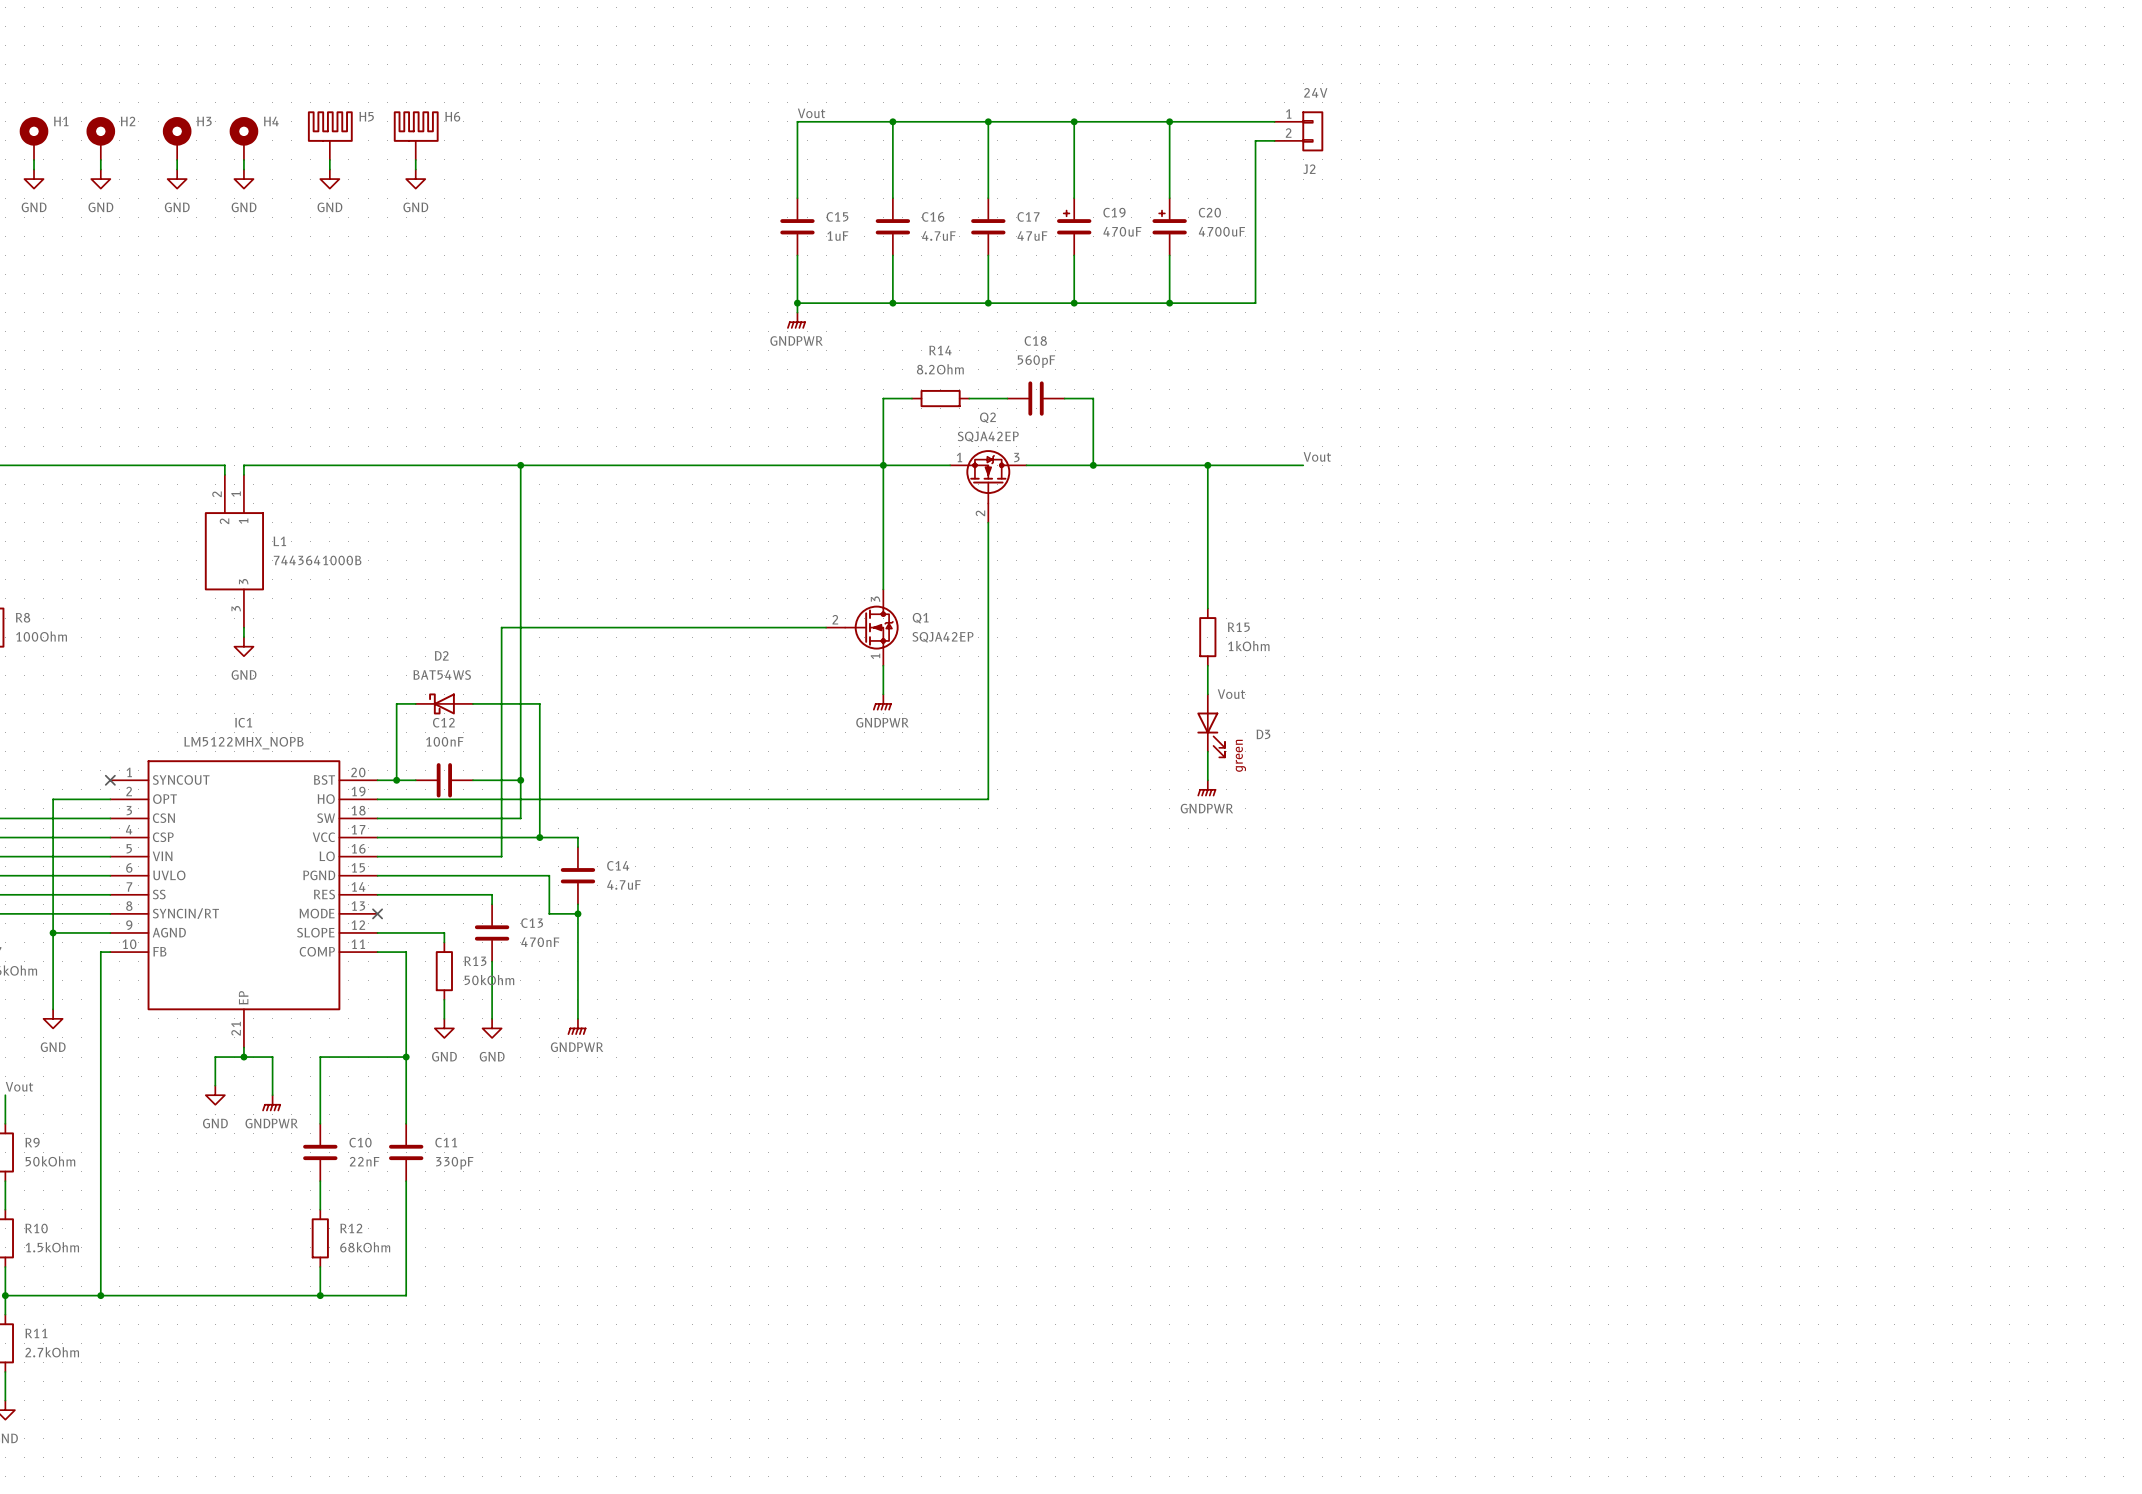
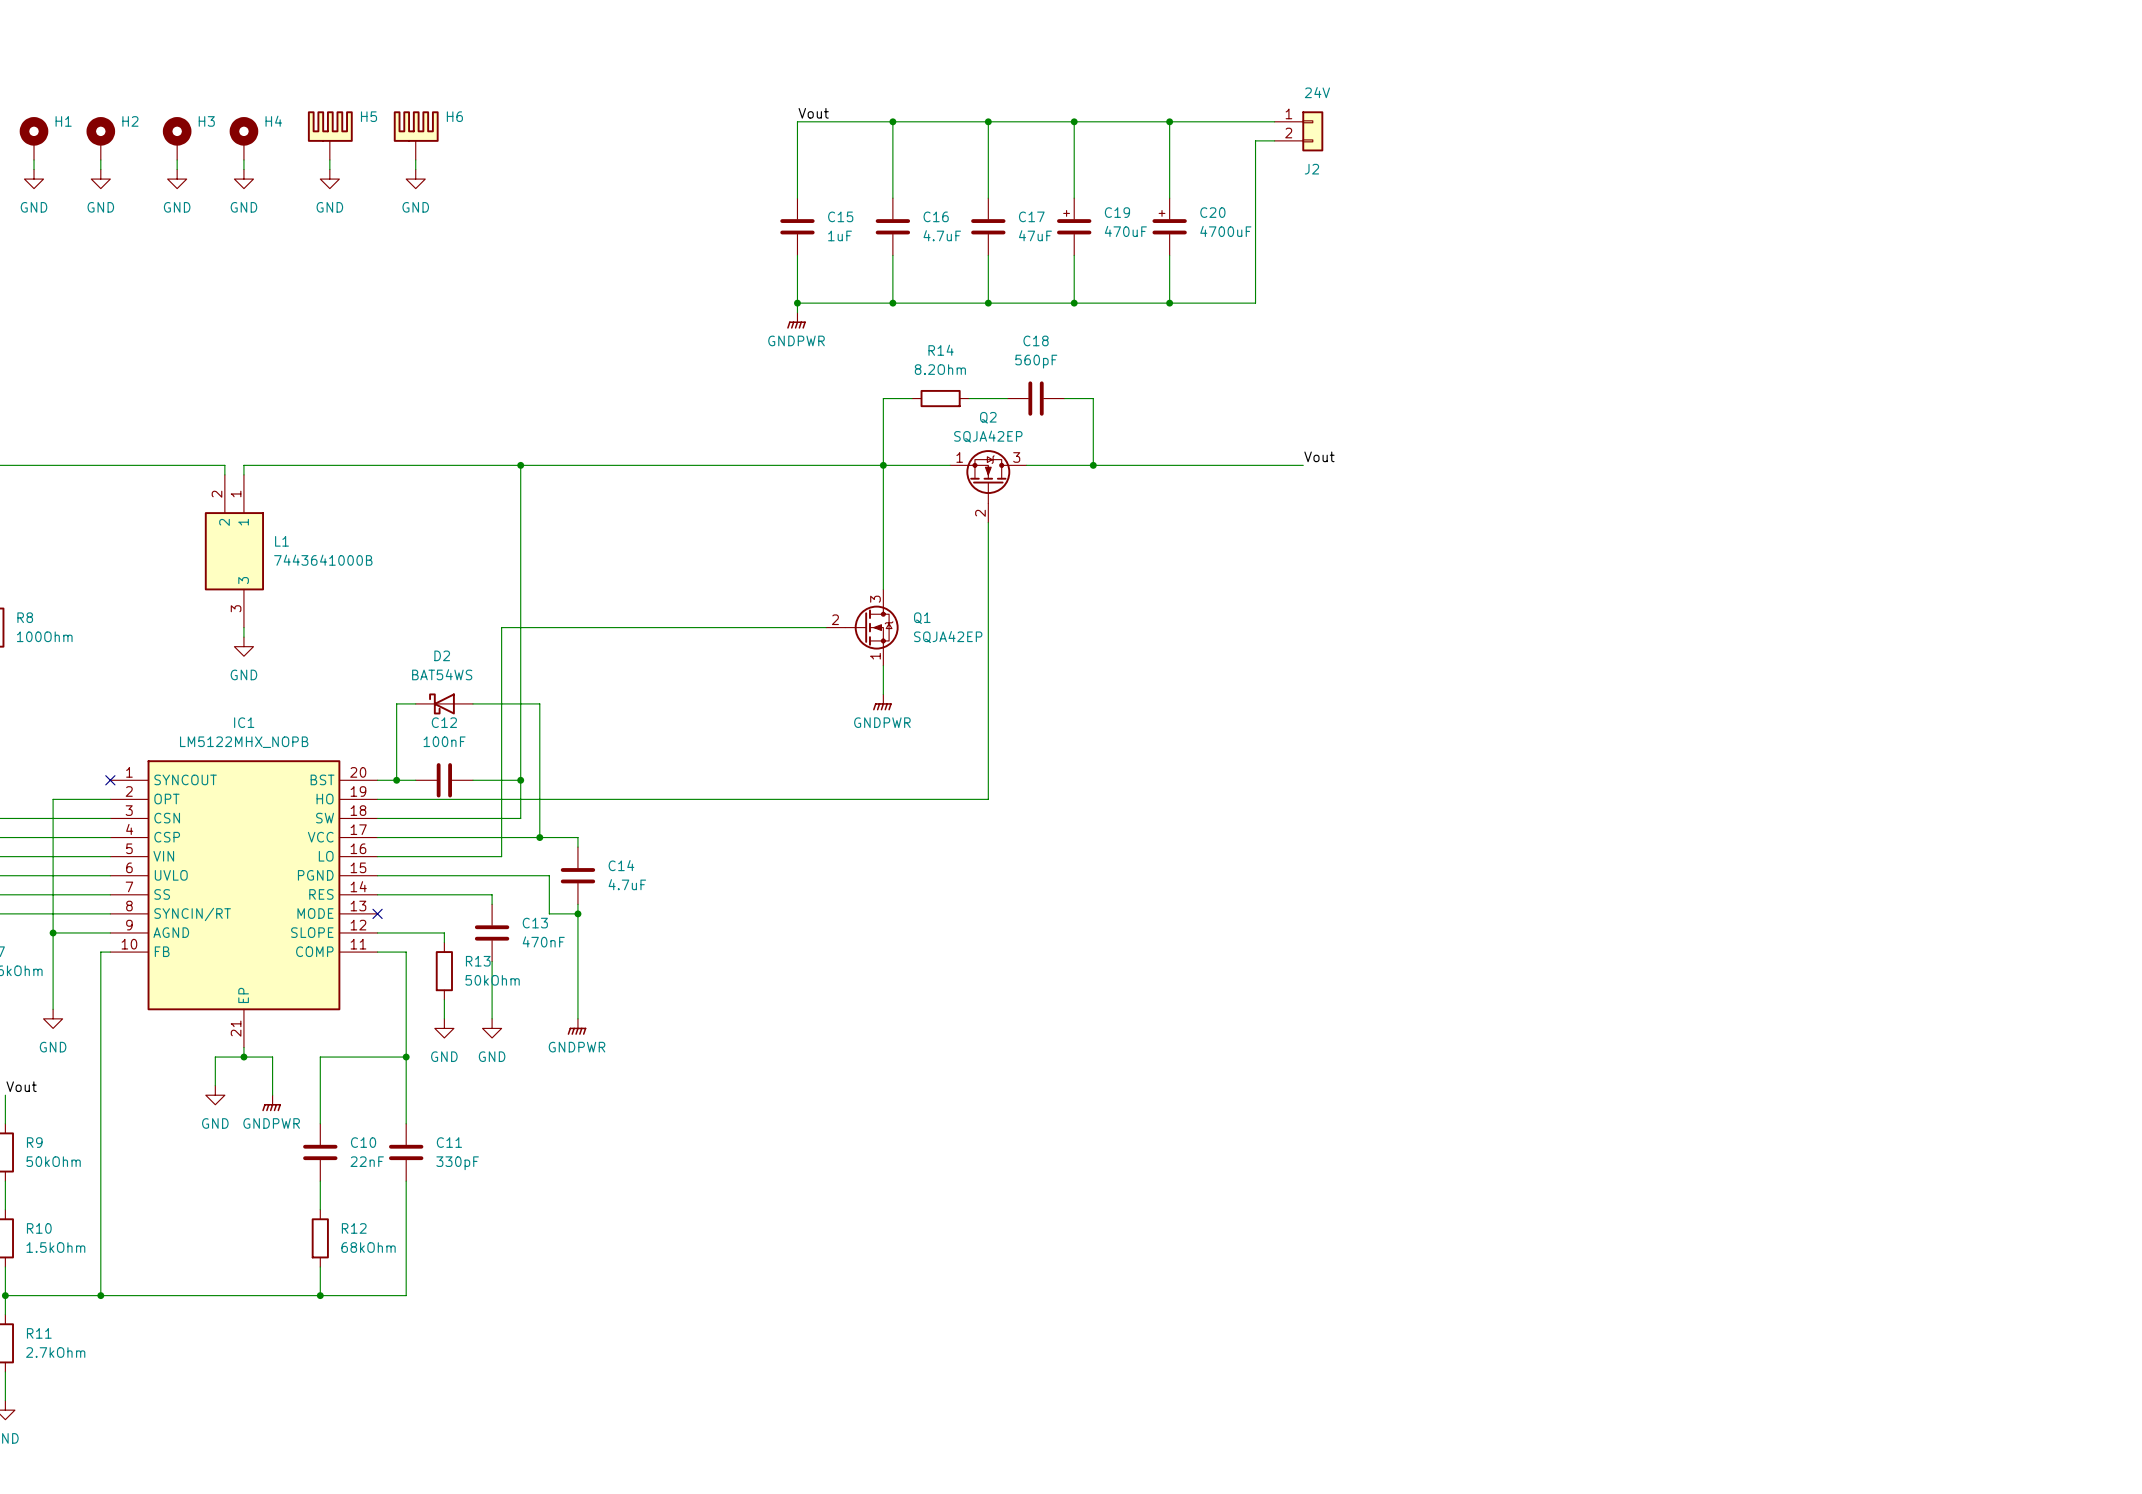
wire: (1207, 465) (1207, 608) -> none
junction: (1207, 465) -> none
R15: 1kOhm (1207, 637) -> none
wire: (1207, 665) (1207, 694) -> none
D3: Vout (1211, 725) -> none
wire: (1207, 751) (1207, 780) -> none
power symbol: GNDPWR (1206, 788) -> none

